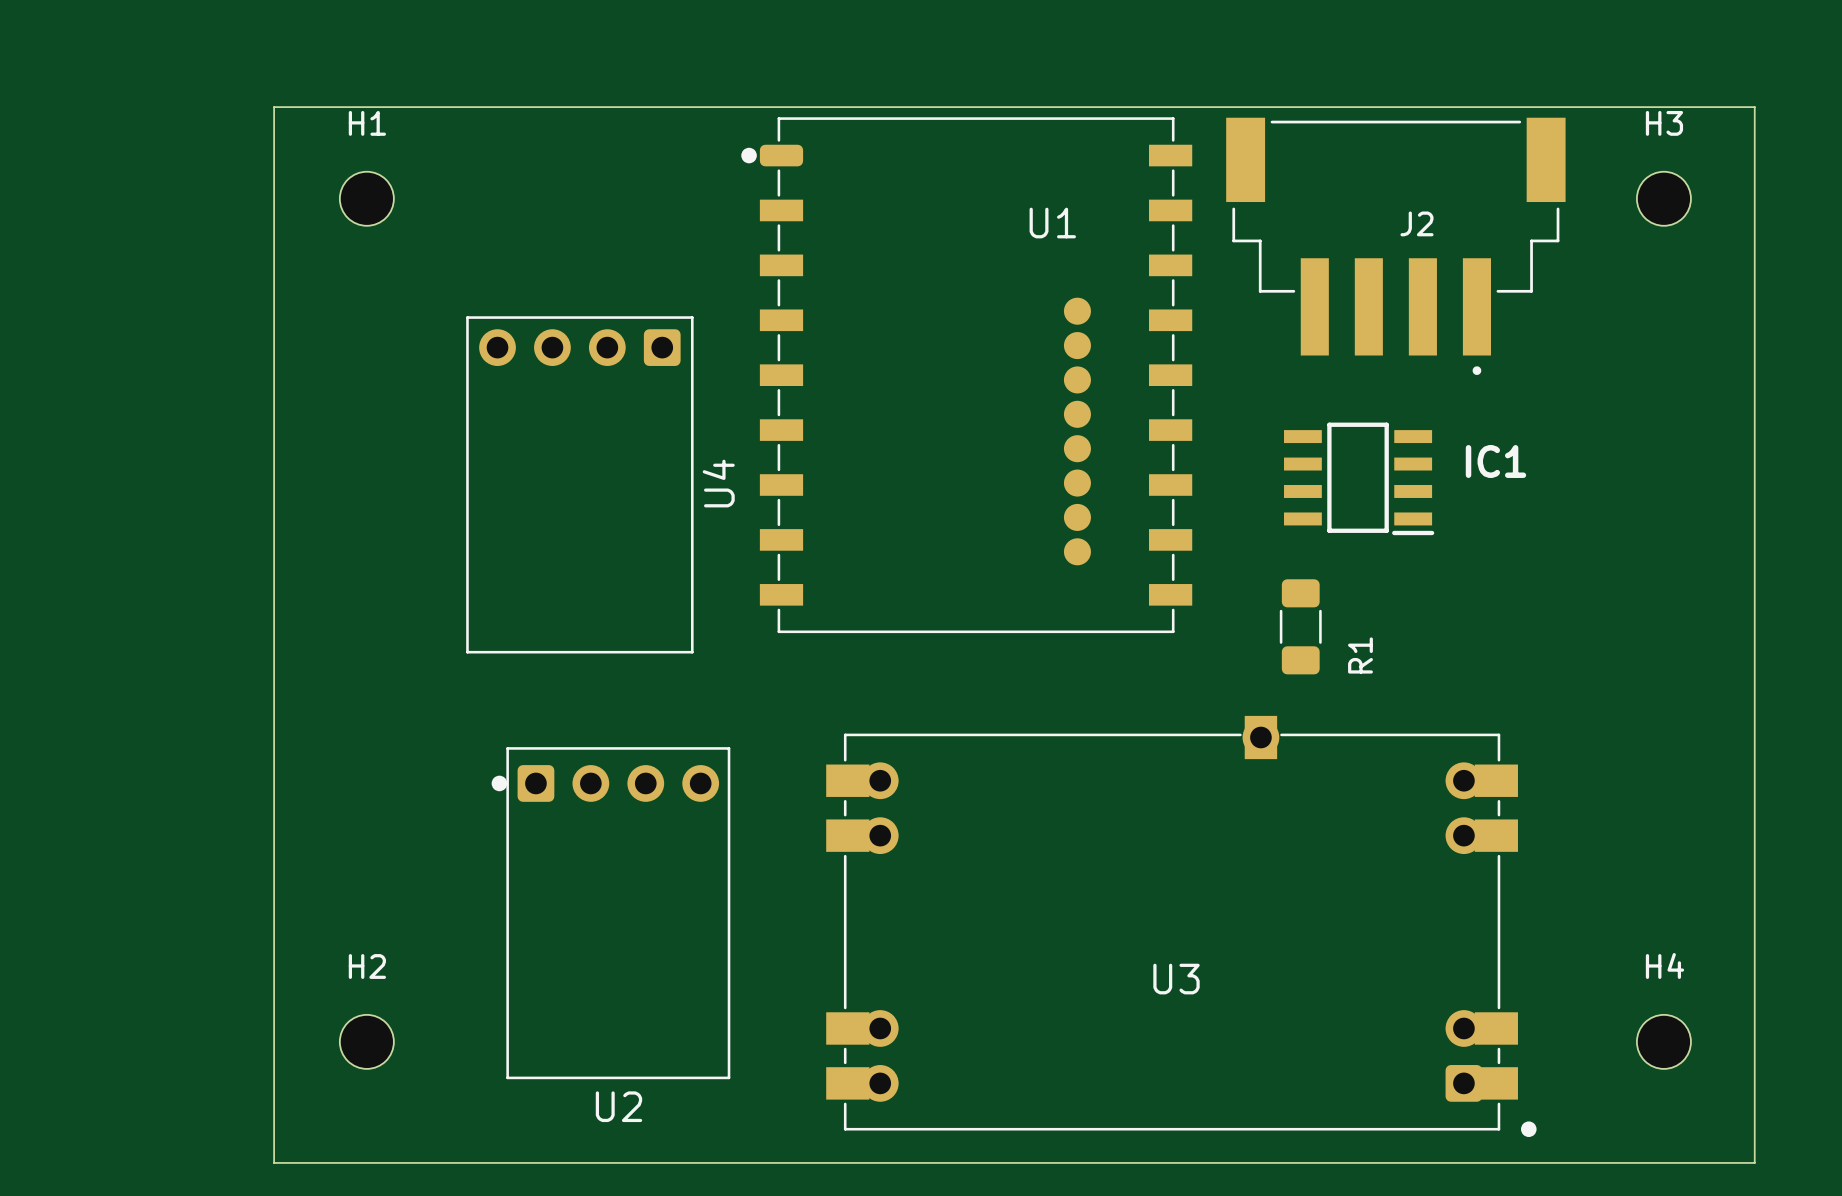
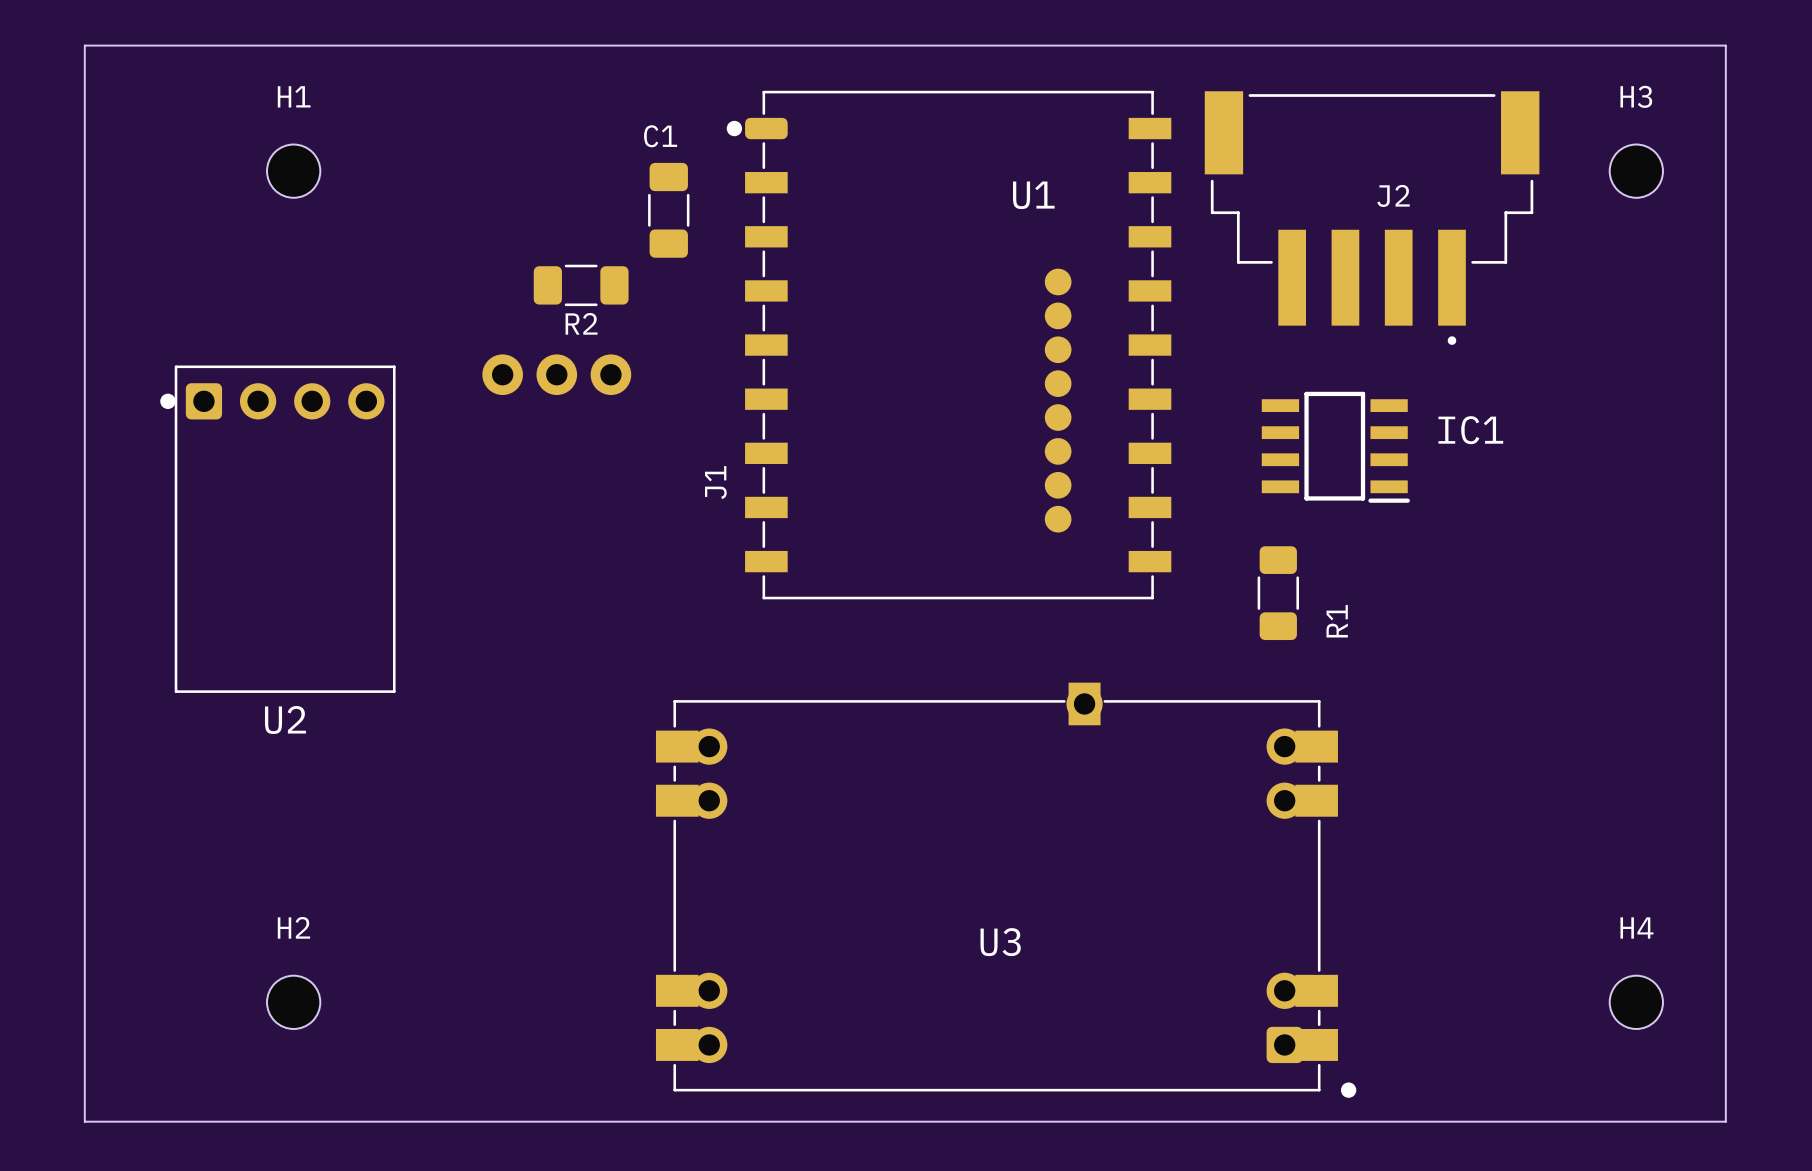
board edge: (1754, 107) (274, 107) (274, 1162) -> (1725, 80) (1725, 45) (84, 45) (84, 1121) (266, 1121)
H1 position: (366, 198) -> (293, 171)
C1: none -> (668, 210)
R2: none -> (581, 285)
J1: none -> (556, 374)
U4: (579, 484) -> none
U2 position: (610, 913) -> (277, 529)
U3 position: (1181, 926) -> (1006, 890)
H2 position: (366, 1041) -> (293, 1002)

